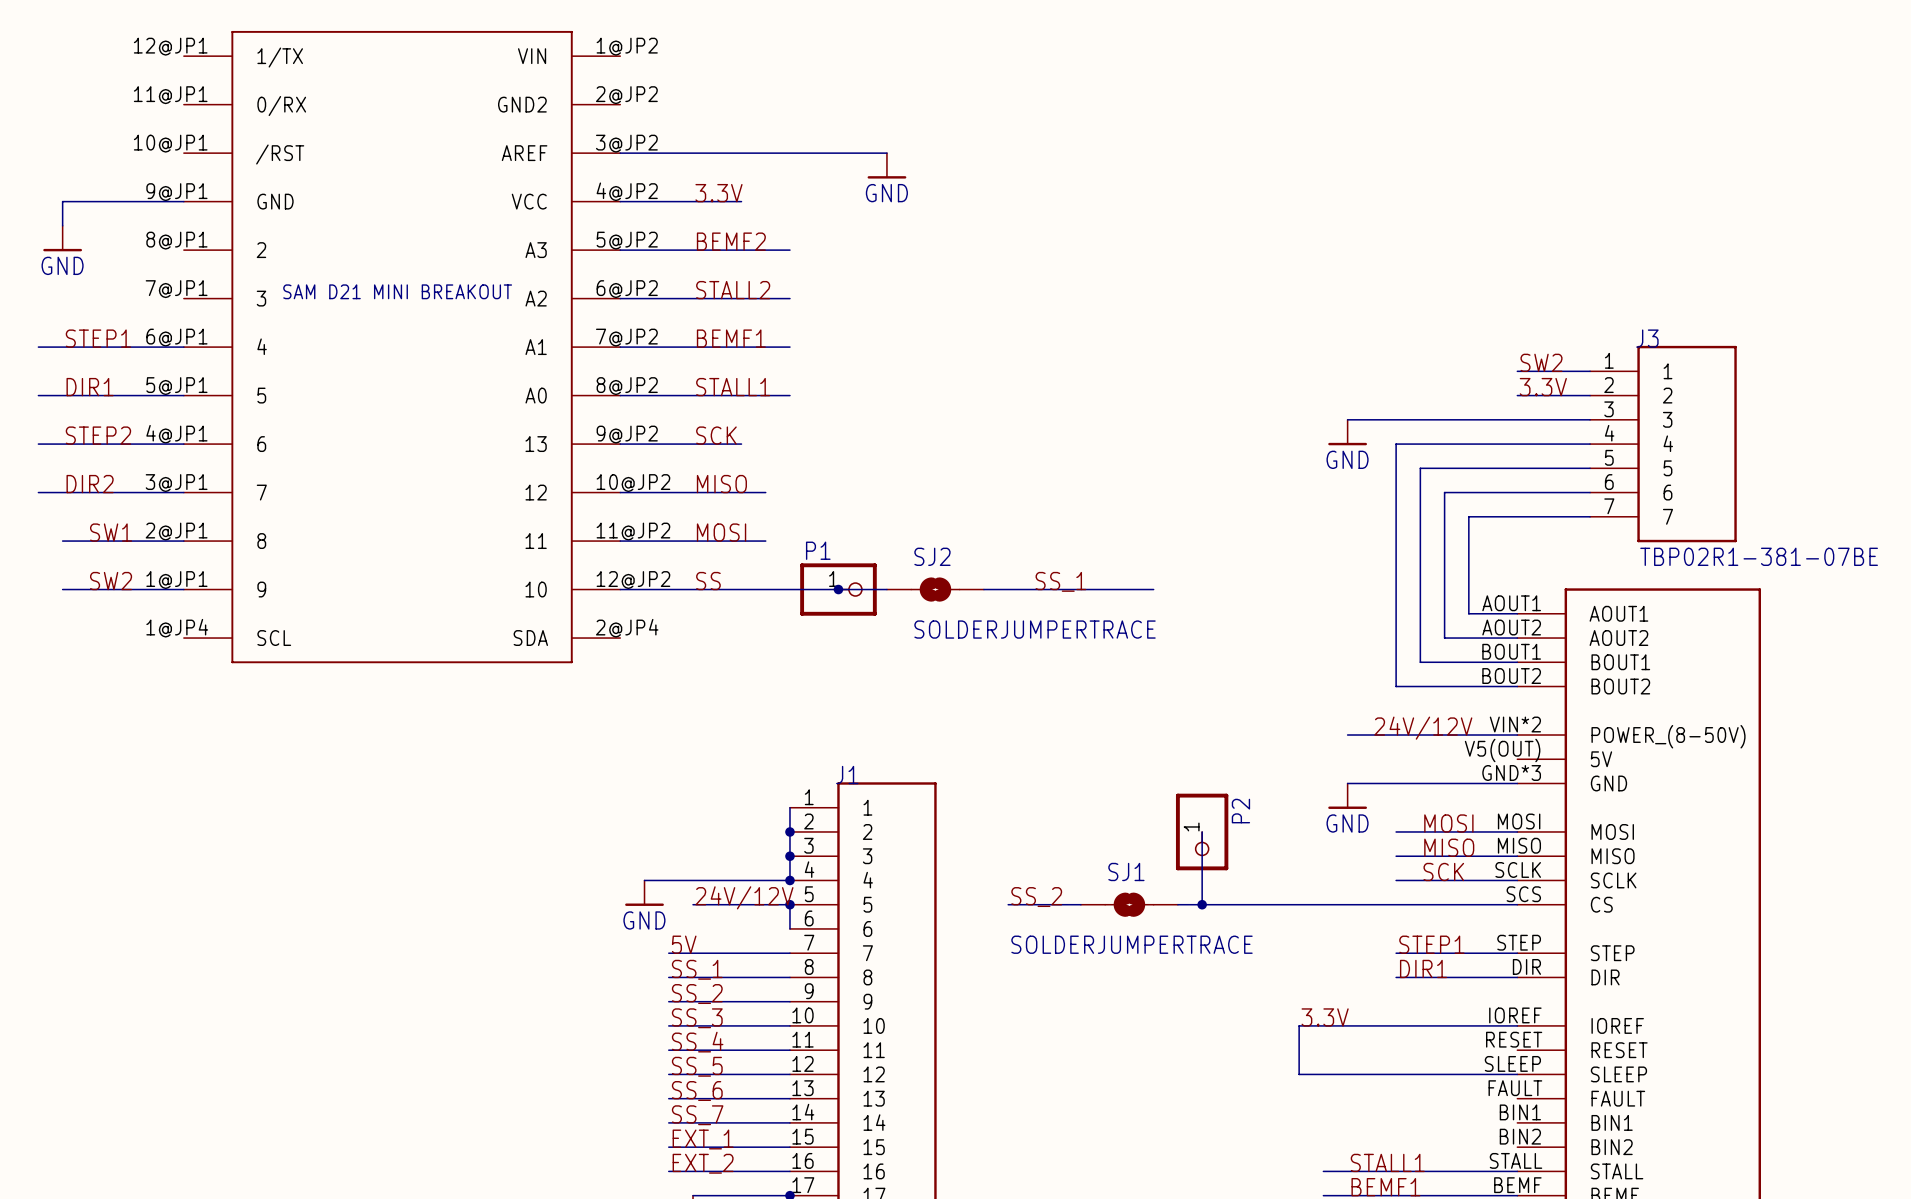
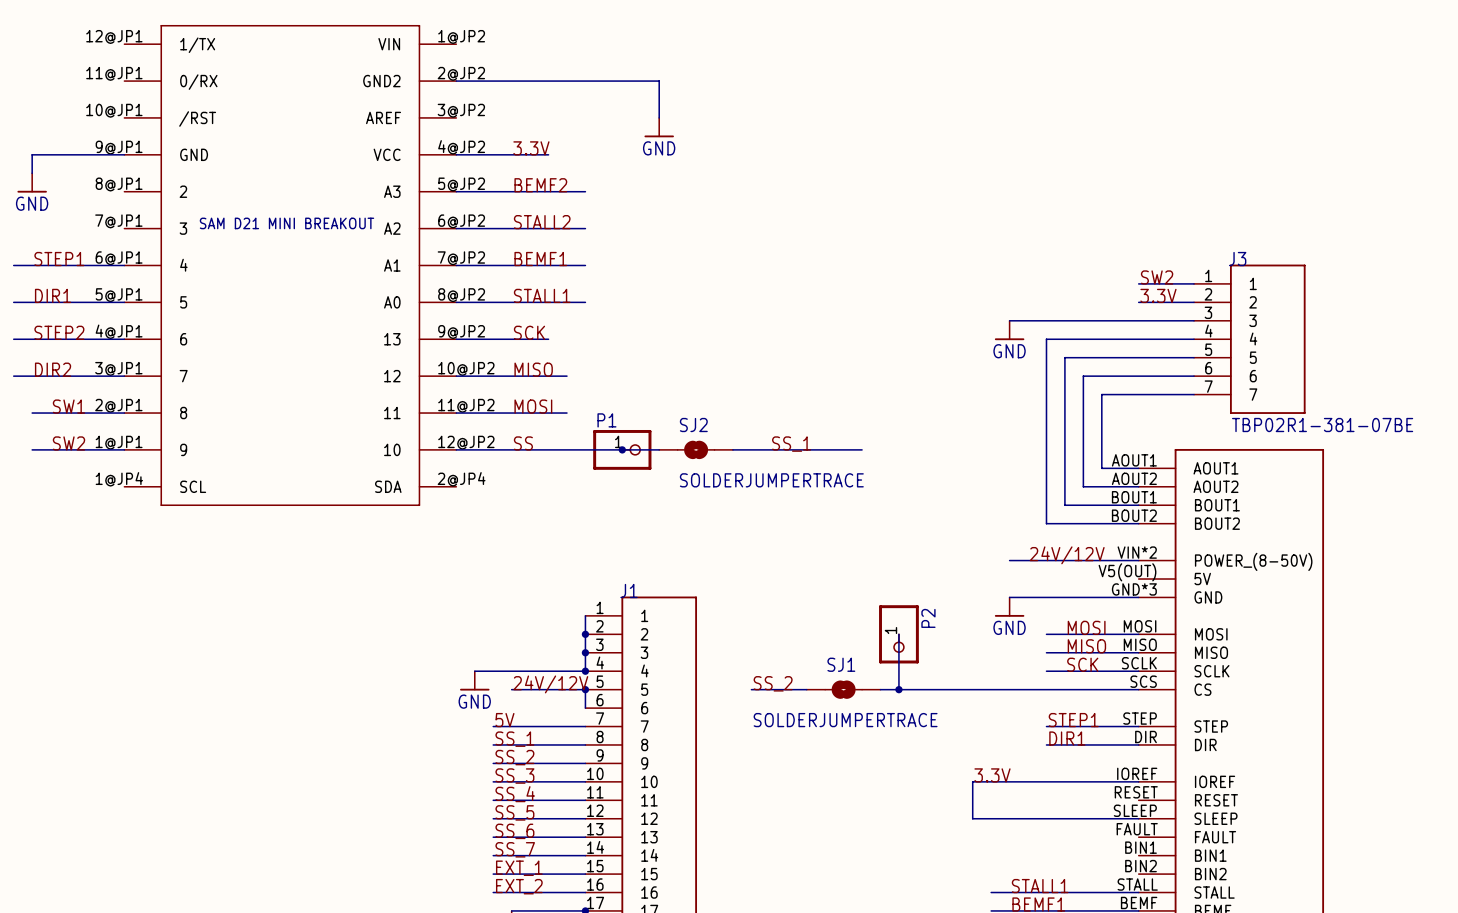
wire: (620, 153) (886, 153) -> (456, 81) (659, 81) (659, 117)

